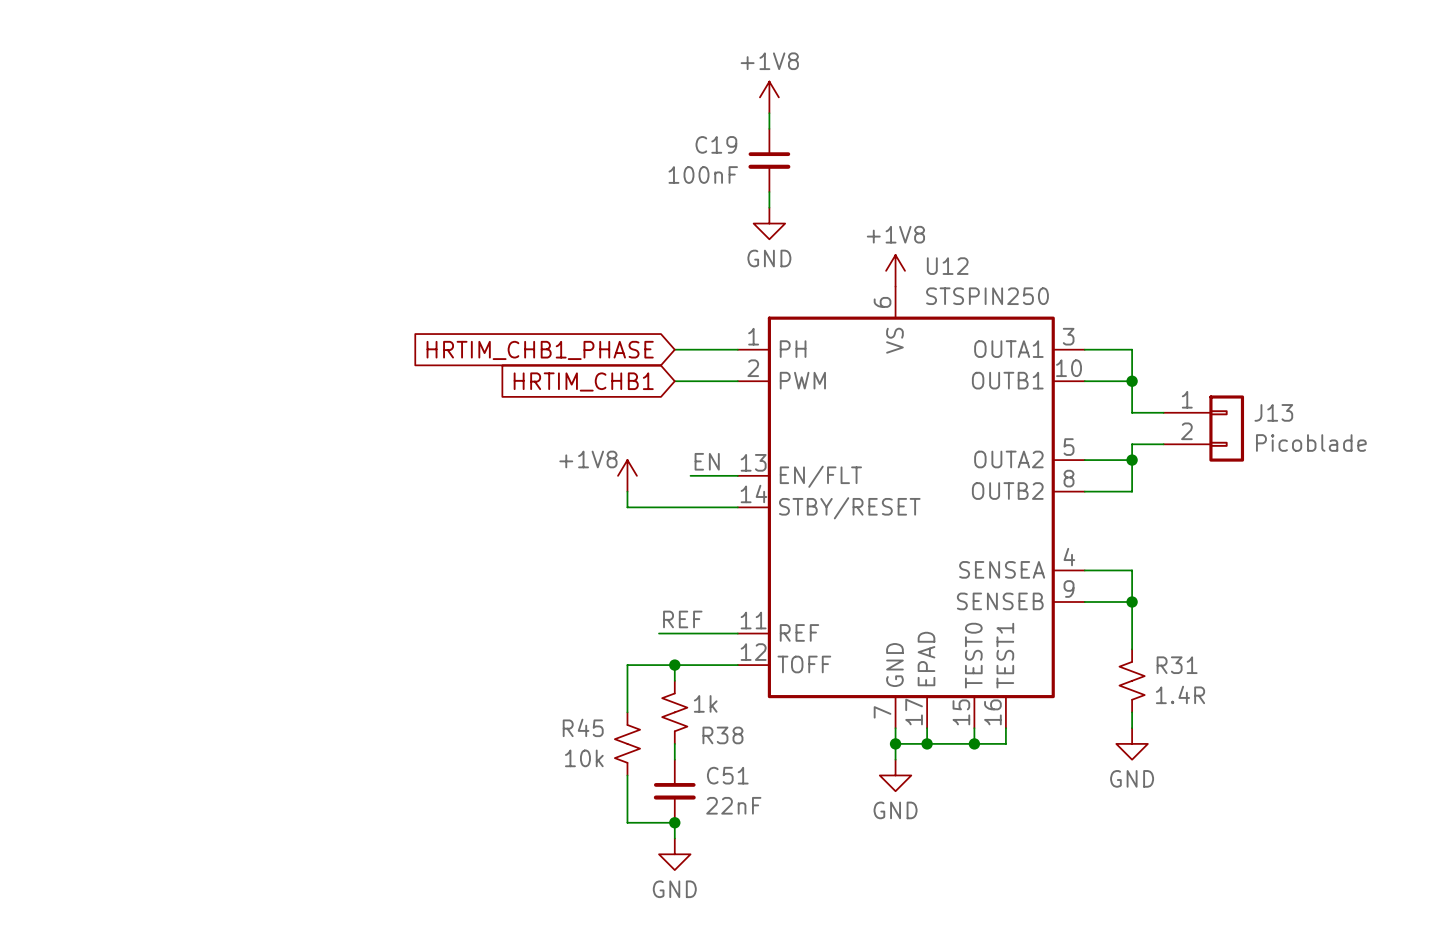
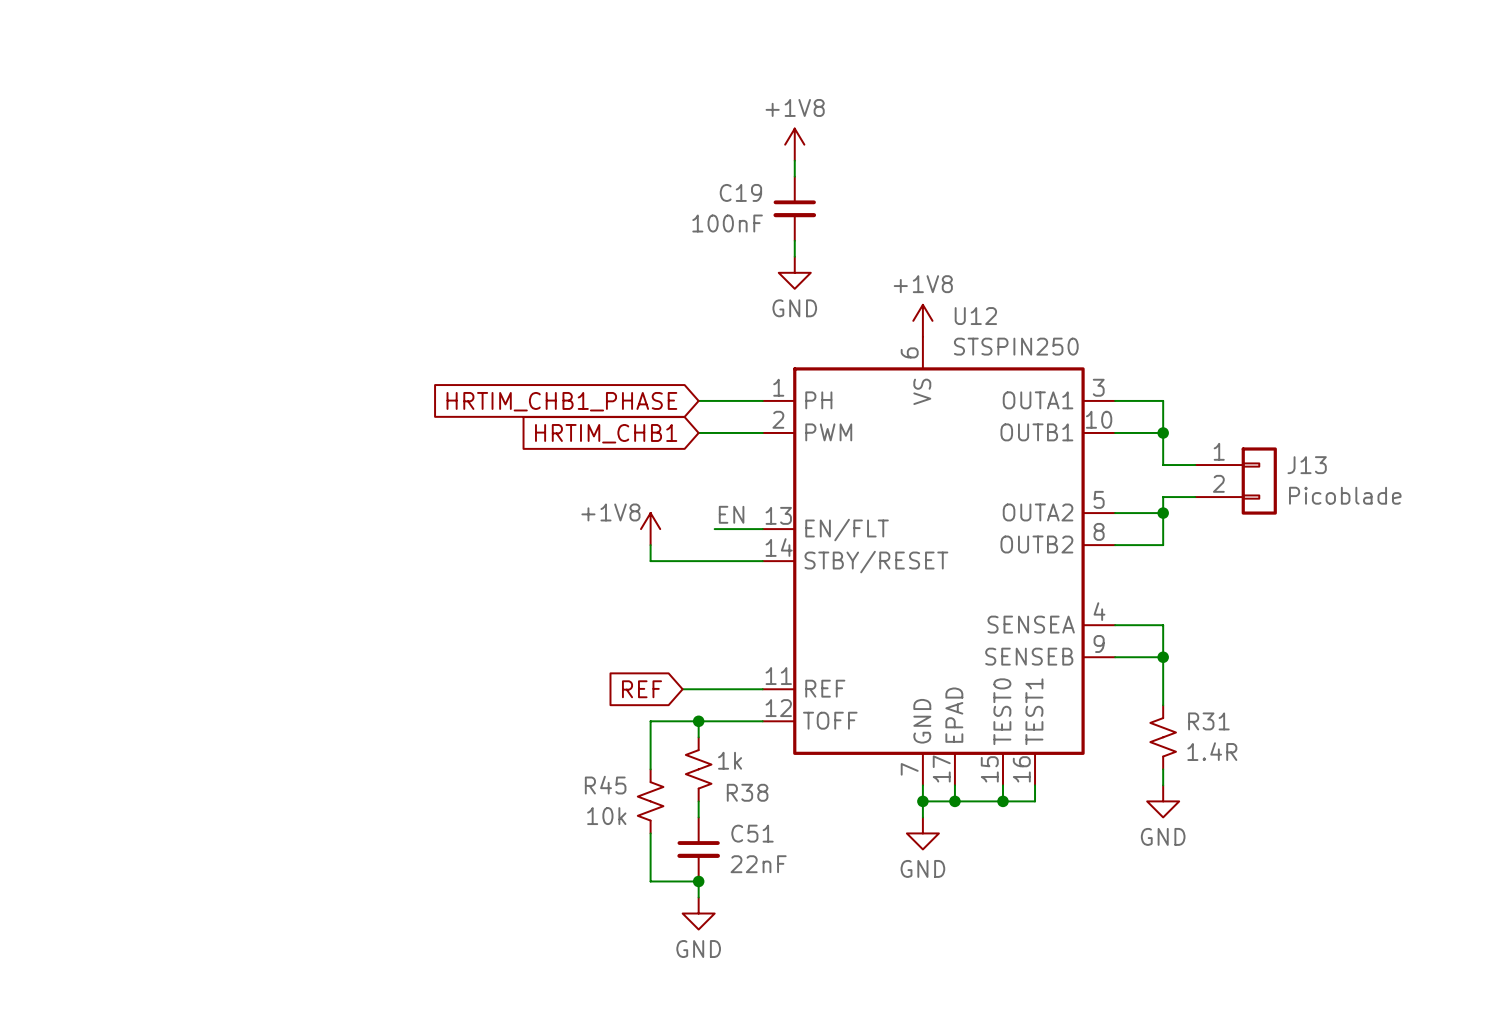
label: REF (682, 619) -> none
global label: none -> REF (642, 689)

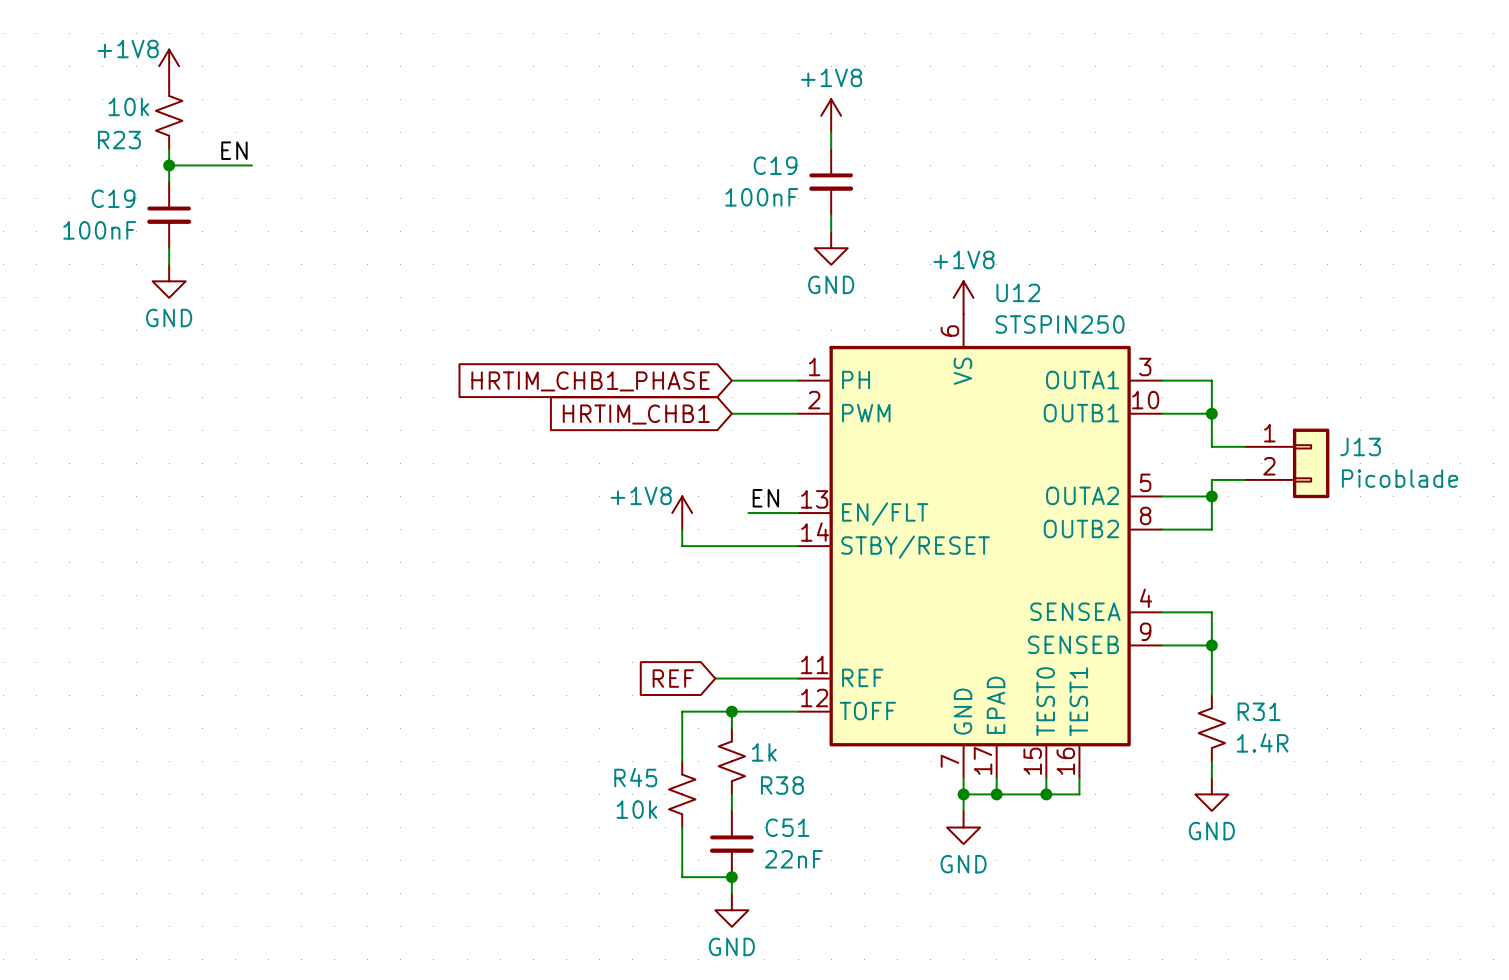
power symbol: none -> +1V8 (169, 66)
R23: none -> 10k (169, 115)
wire: none -> (169, 148) (169, 182)
label: none -> EN (234, 150)
wire: none -> (169, 165) (251, 165)
junction: none -> (169, 165)
C19: none -> 100nF (169, 215)
wire: none -> (169, 248) (169, 264)
power symbol: none -> GND (169, 281)

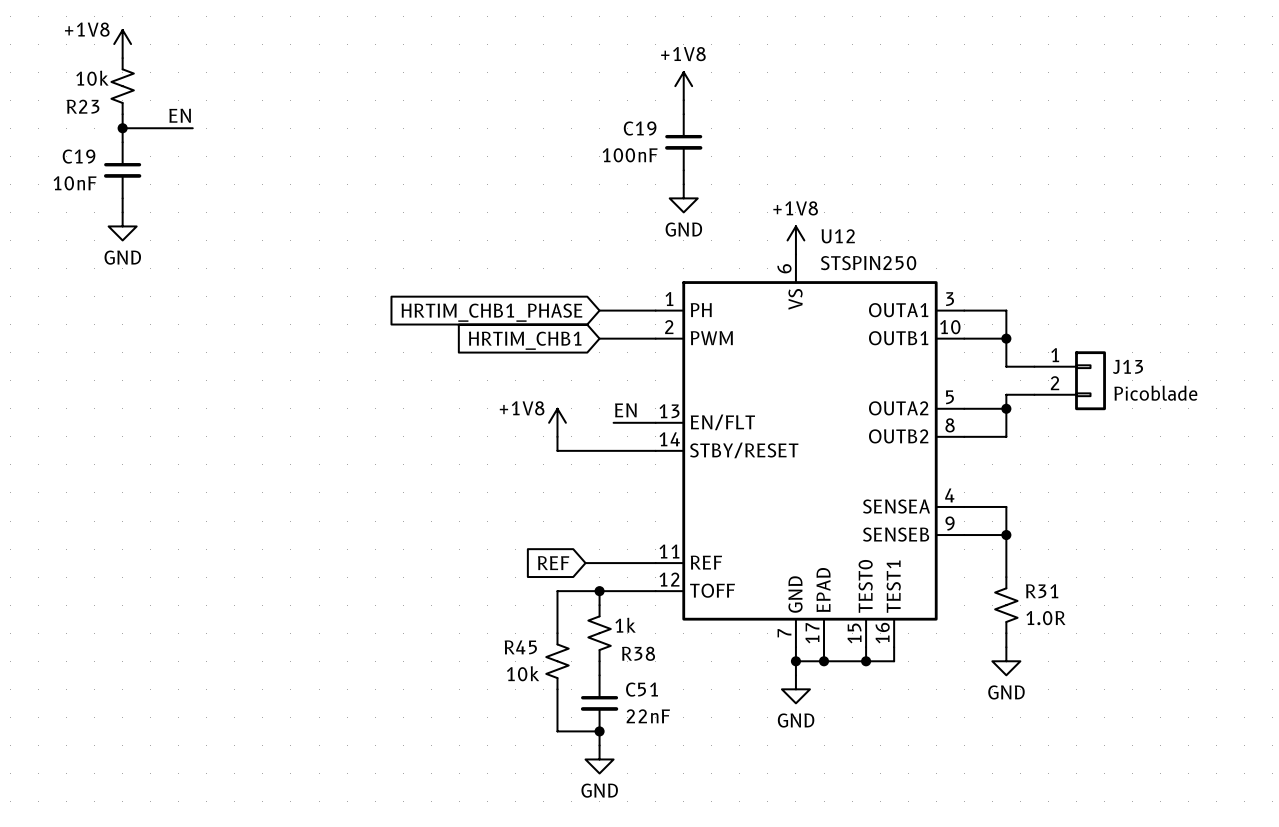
C19 value: 100nF (99, 230) -> 10nF (75, 183)
R31 value: 1.4R (1262, 742) -> 1.0R (1045, 618)

